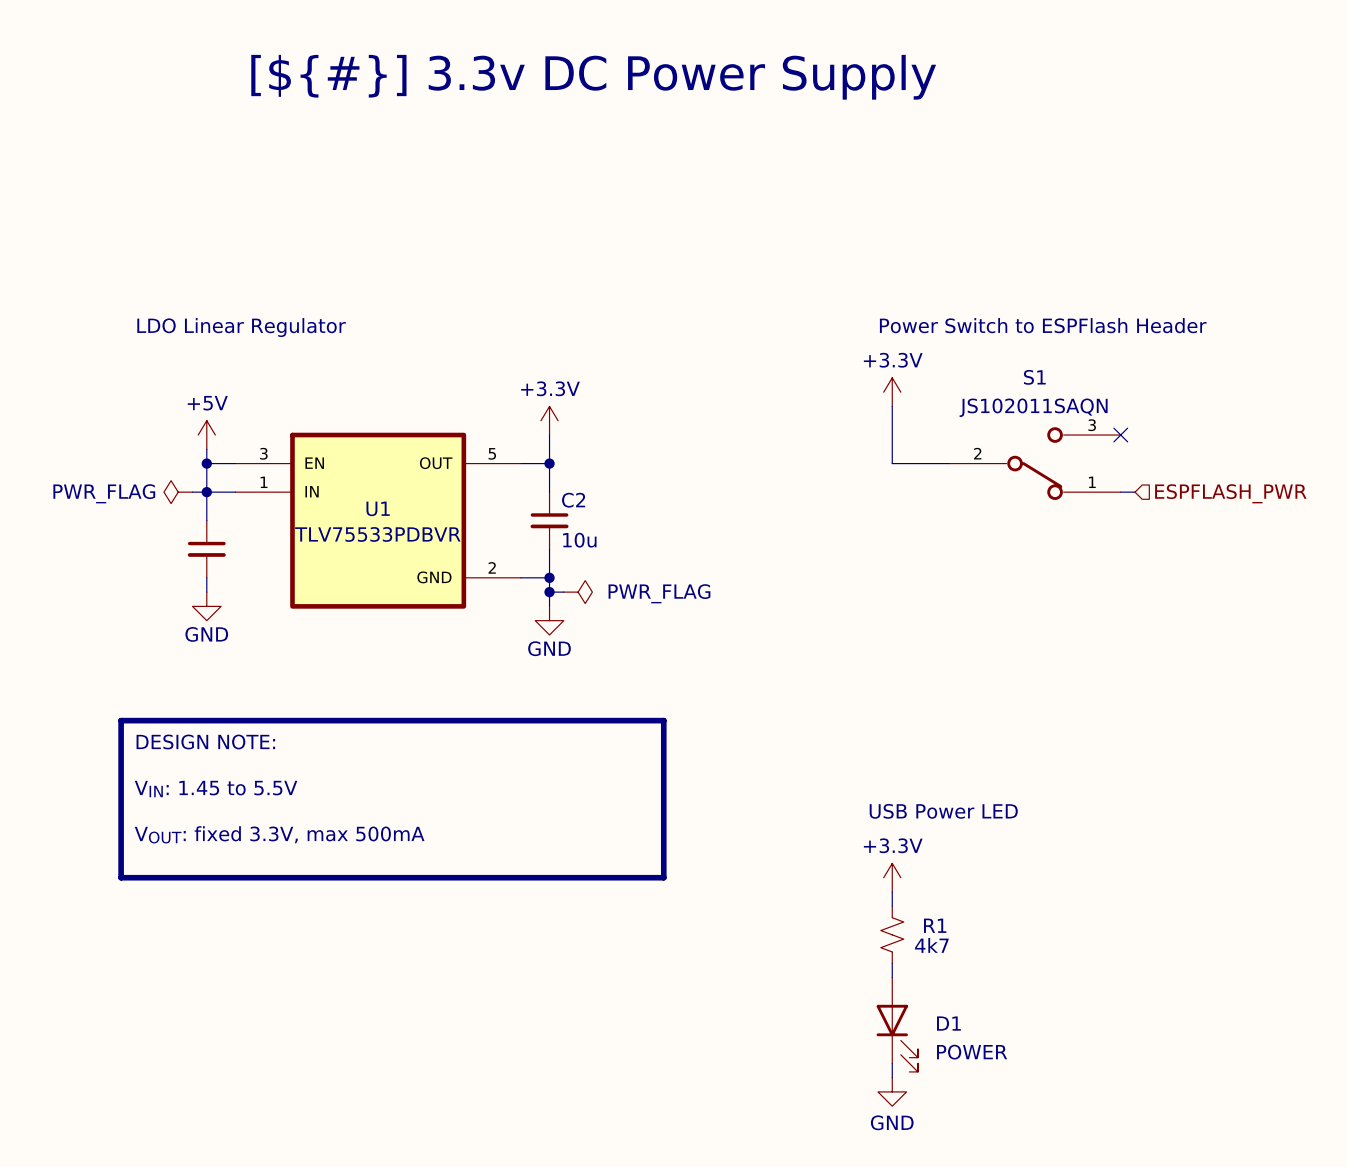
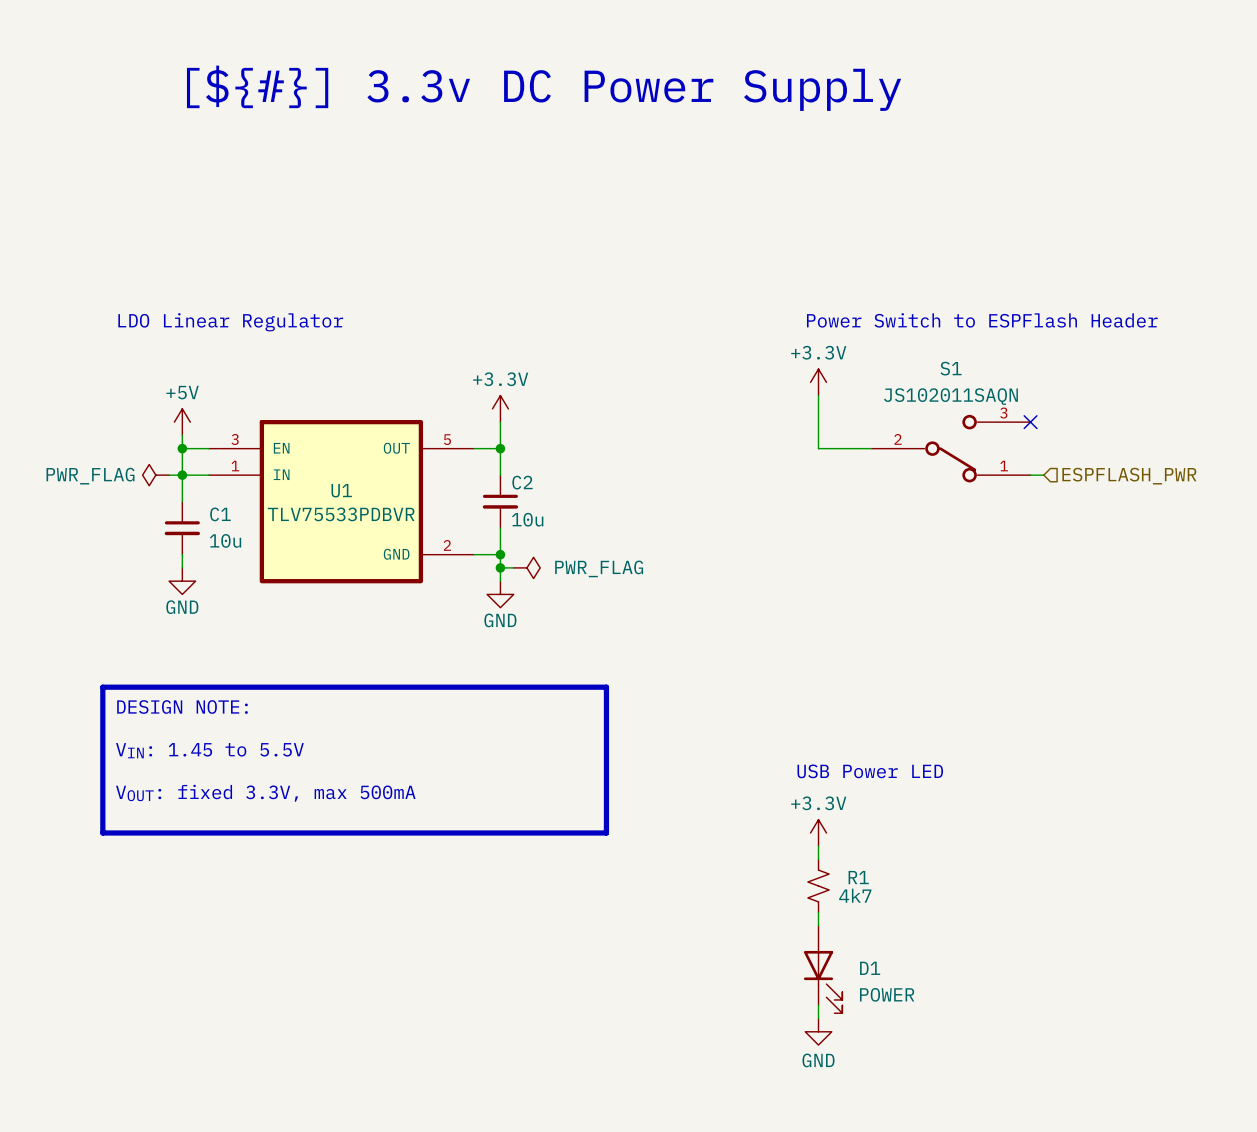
C1 name: none -> C1 (220, 514)
C1 value: none -> 10u (225, 540)

